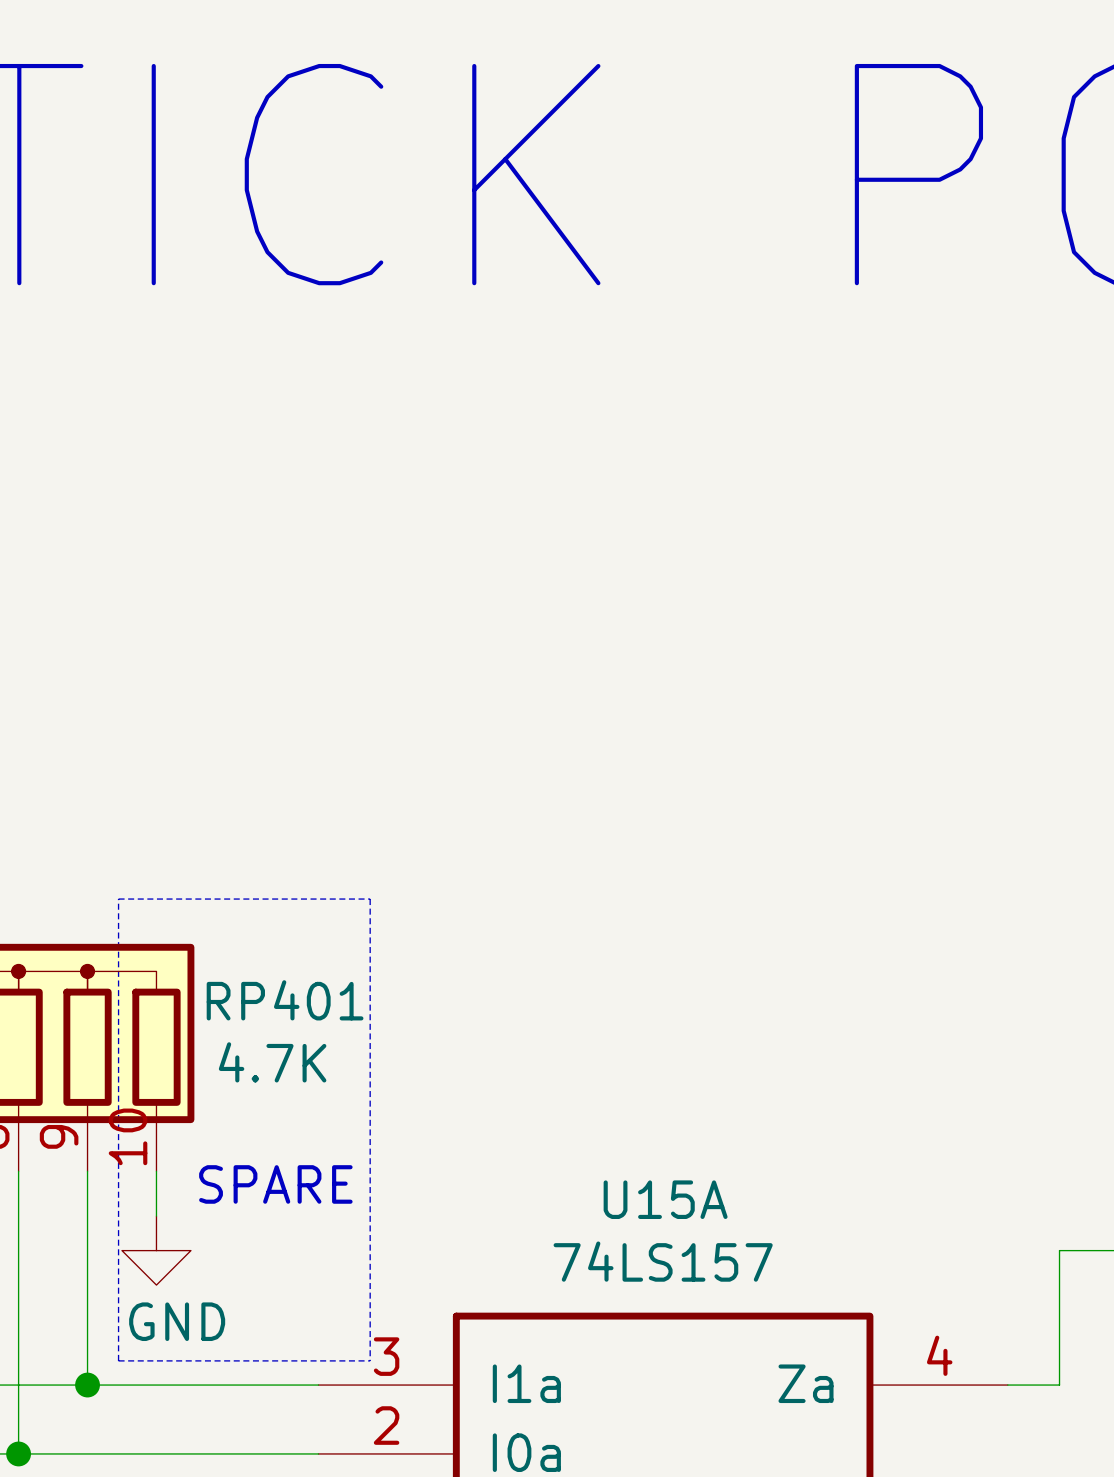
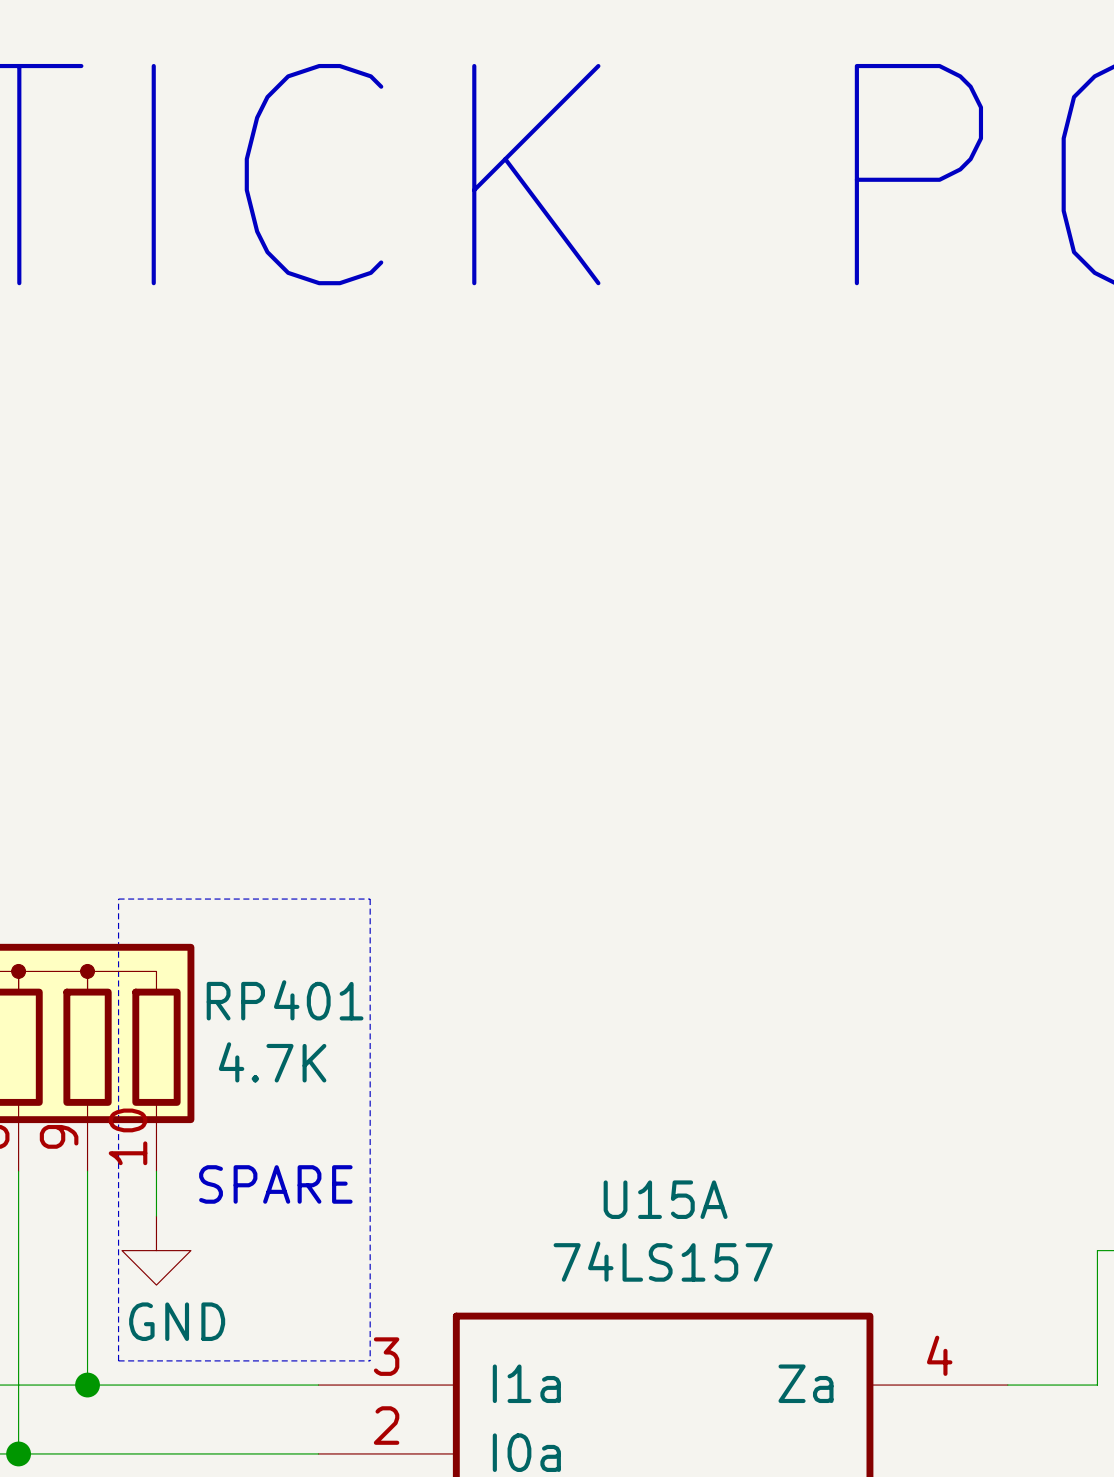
wire: (1097, 1250) (1059, 1250) (1059, 1385) -> (1097, 1250) (1097, 1385) (1059, 1385)

